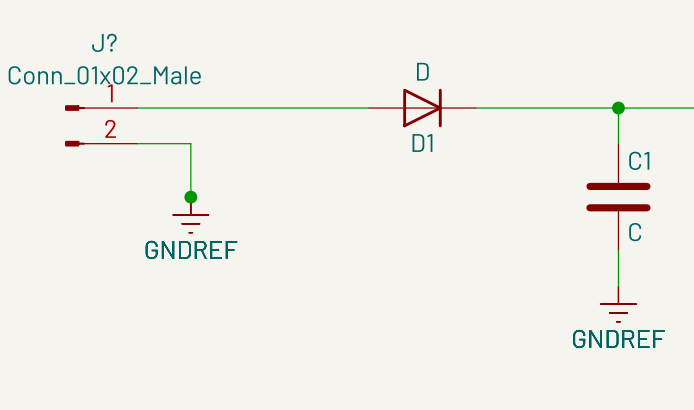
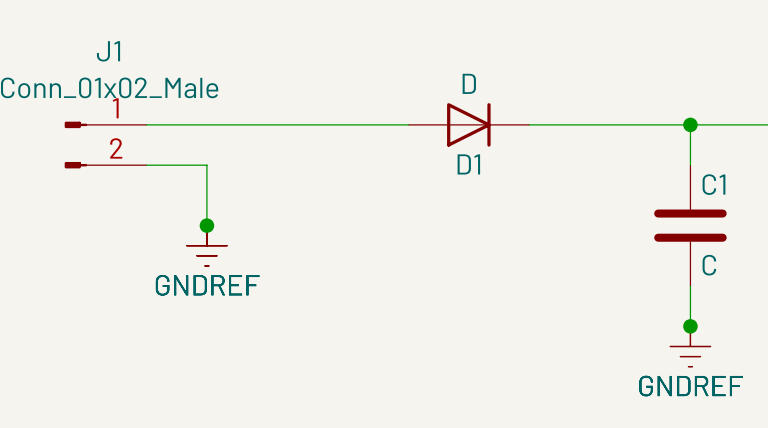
J? name: J? (104, 42) -> J1 (108, 51)
junction: none -> (690, 326)

